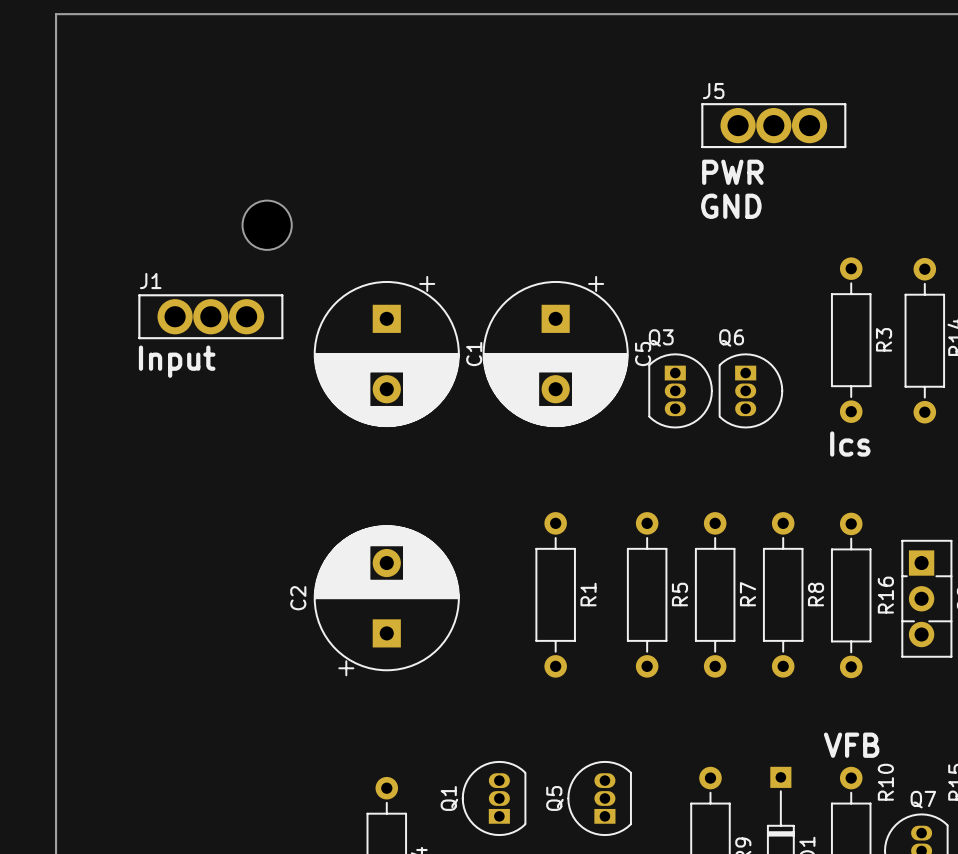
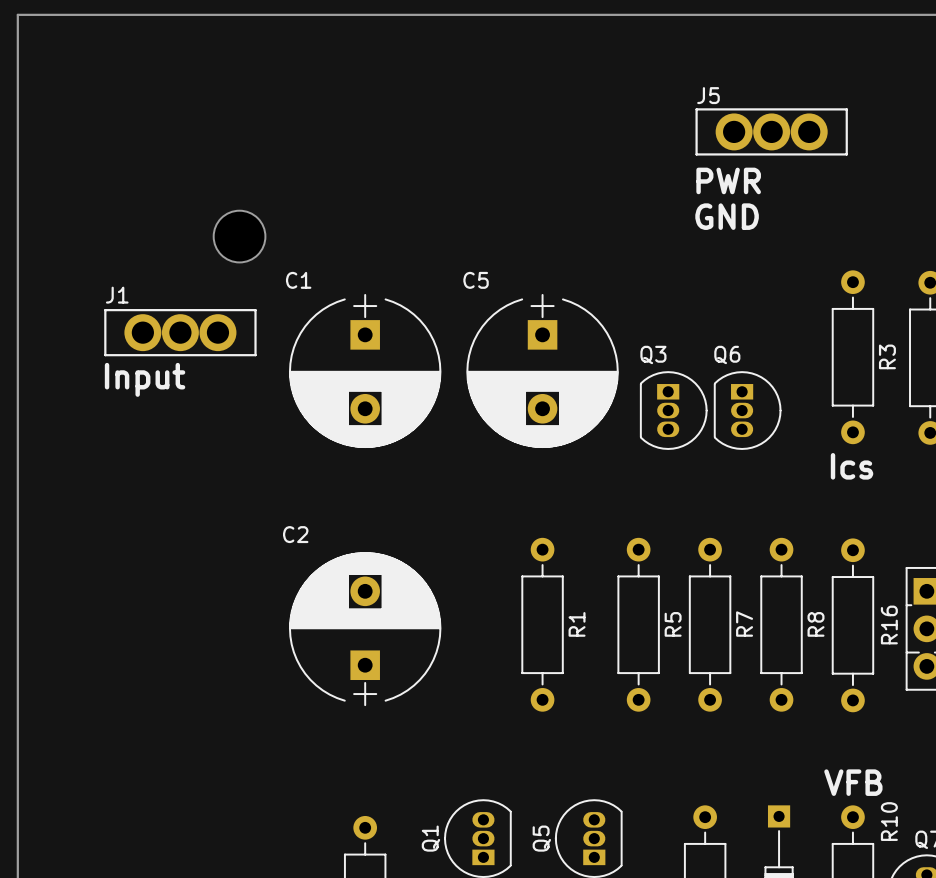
C1 footprint: [313, 276, 460, 427] -> [289, 294, 442, 448]
C5 footprint: [482, 276, 629, 427] -> [466, 294, 619, 448]
C1 name position: C1 (474, 354) -> C1 (298, 280)
C5 name position: C5 (643, 354) -> C5 (476, 280)
C2 footprint: [313, 525, 460, 677] -> [289, 552, 442, 707]
C2 name position: C2 (298, 598) -> C2 (295, 534)

